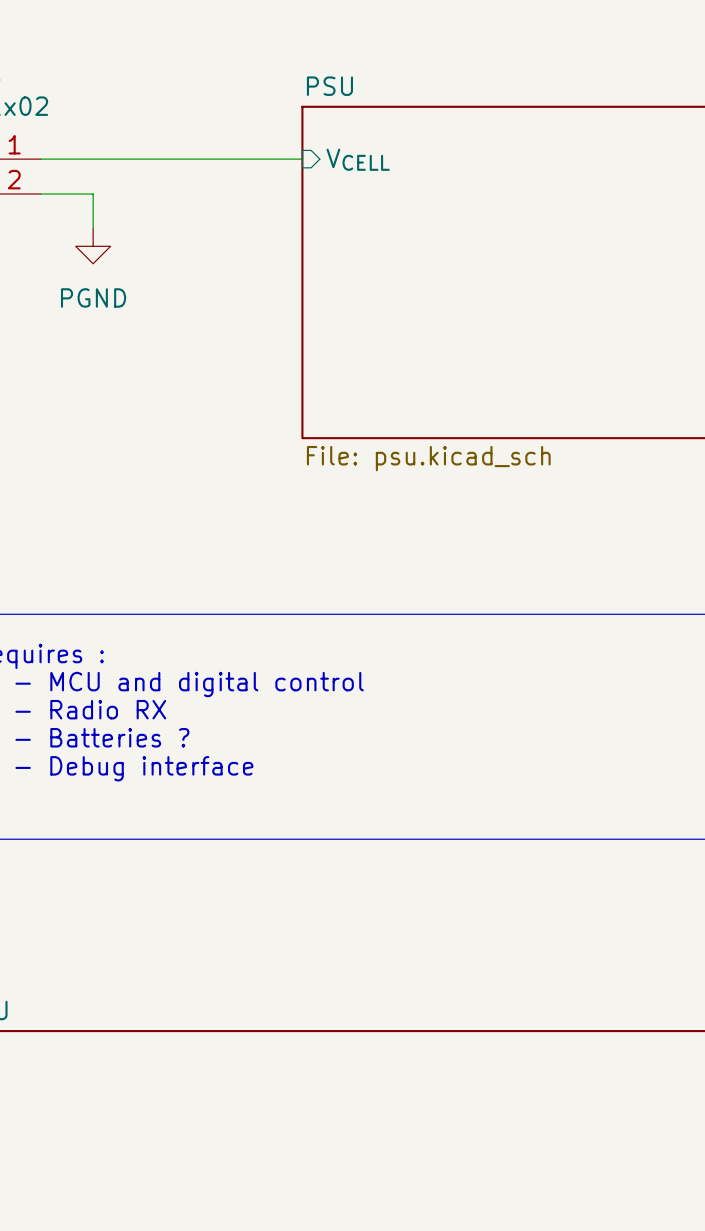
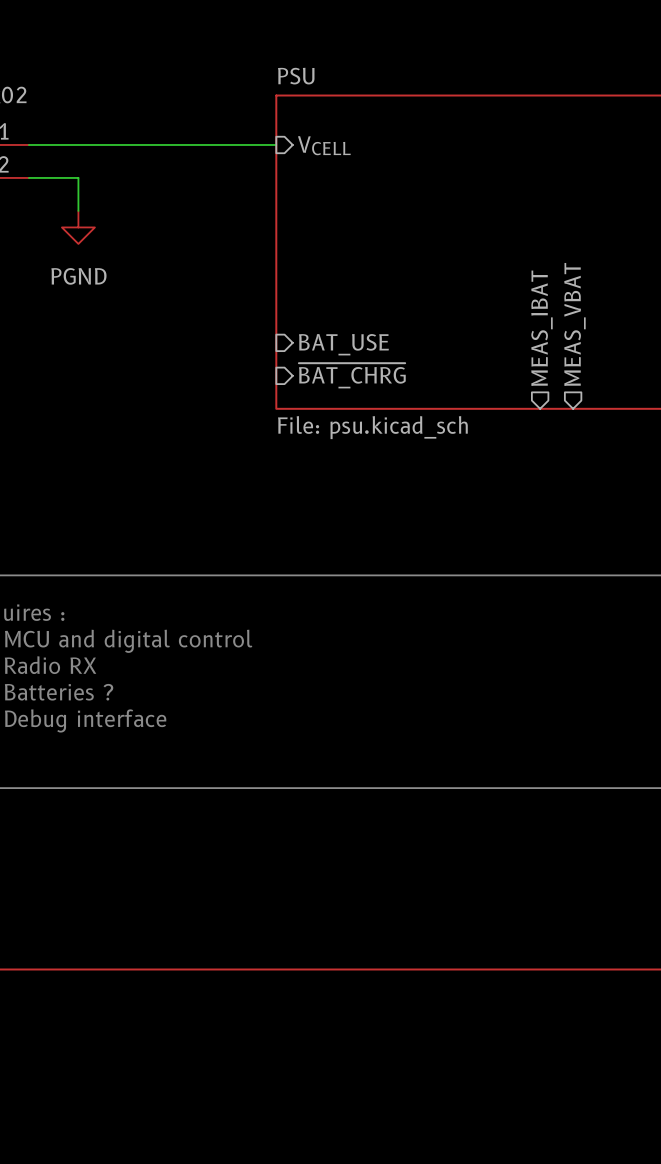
sheet pin: none -> MEAS_VBAT (574, 324)
sheet pin: none -> MEAS_IBAT (541, 328)
sheet pin: none -> BAT_USE (343, 344)
sheet pin: none -> ~{BAT_CHRG} (352, 375)

